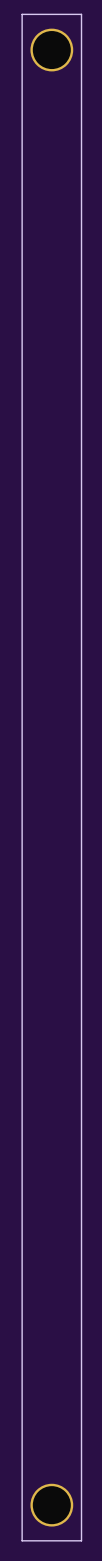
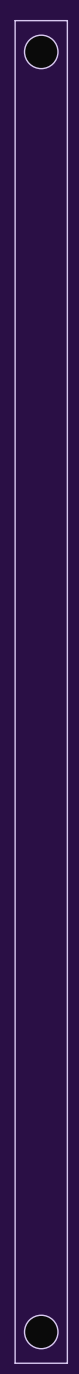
part footprint: [30, 28, 74, 72] -> [24, 35, 58, 69]
part footprint: [30, 1483, 74, 1527] -> [24, 1315, 58, 1349]

